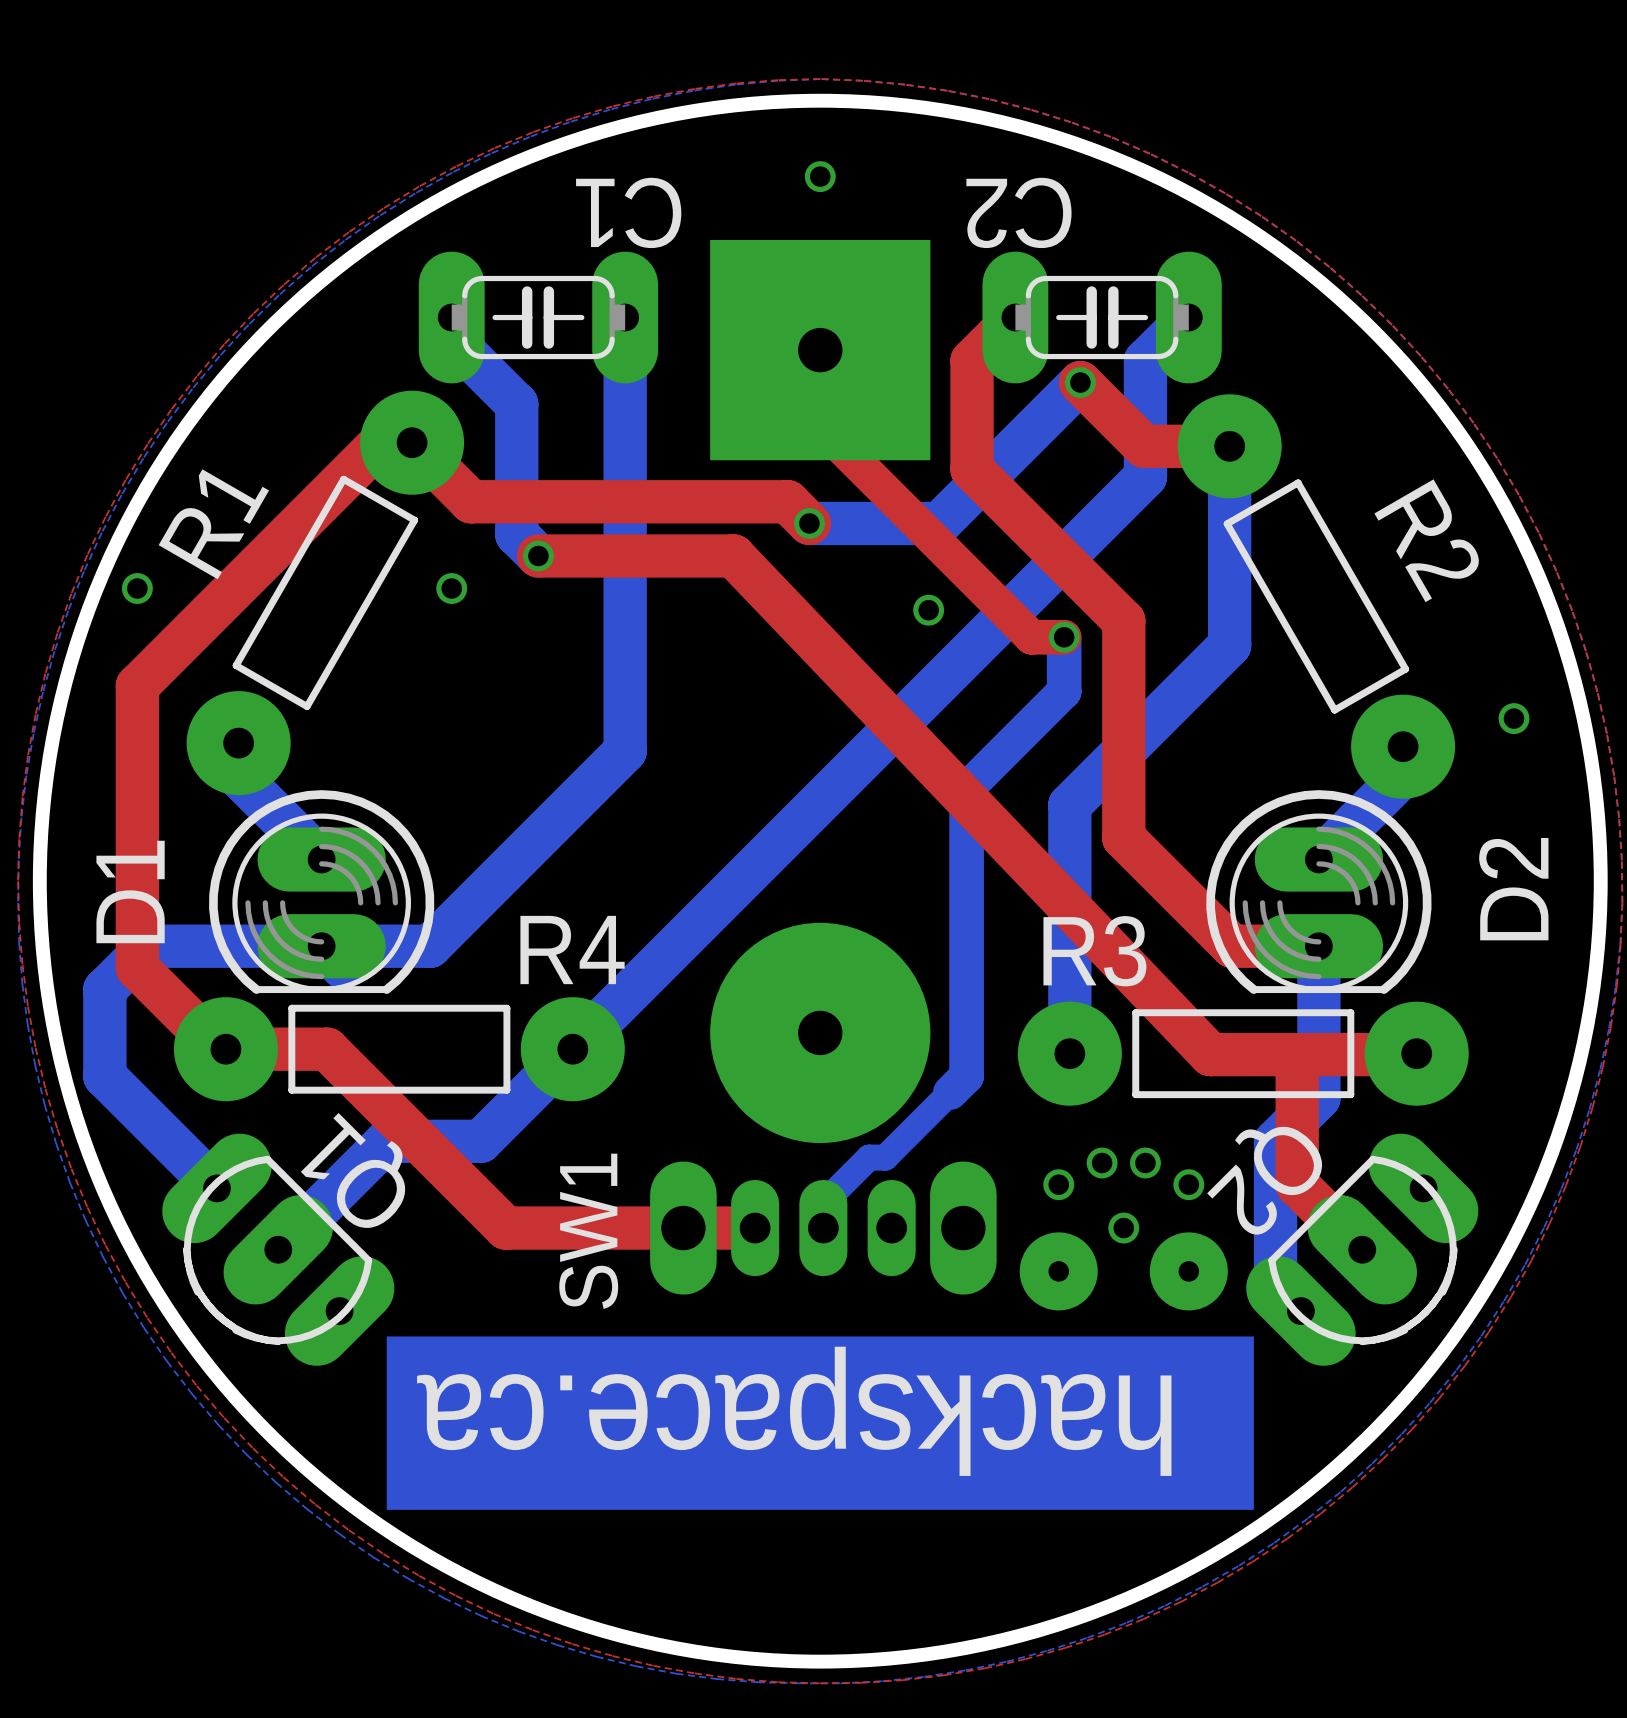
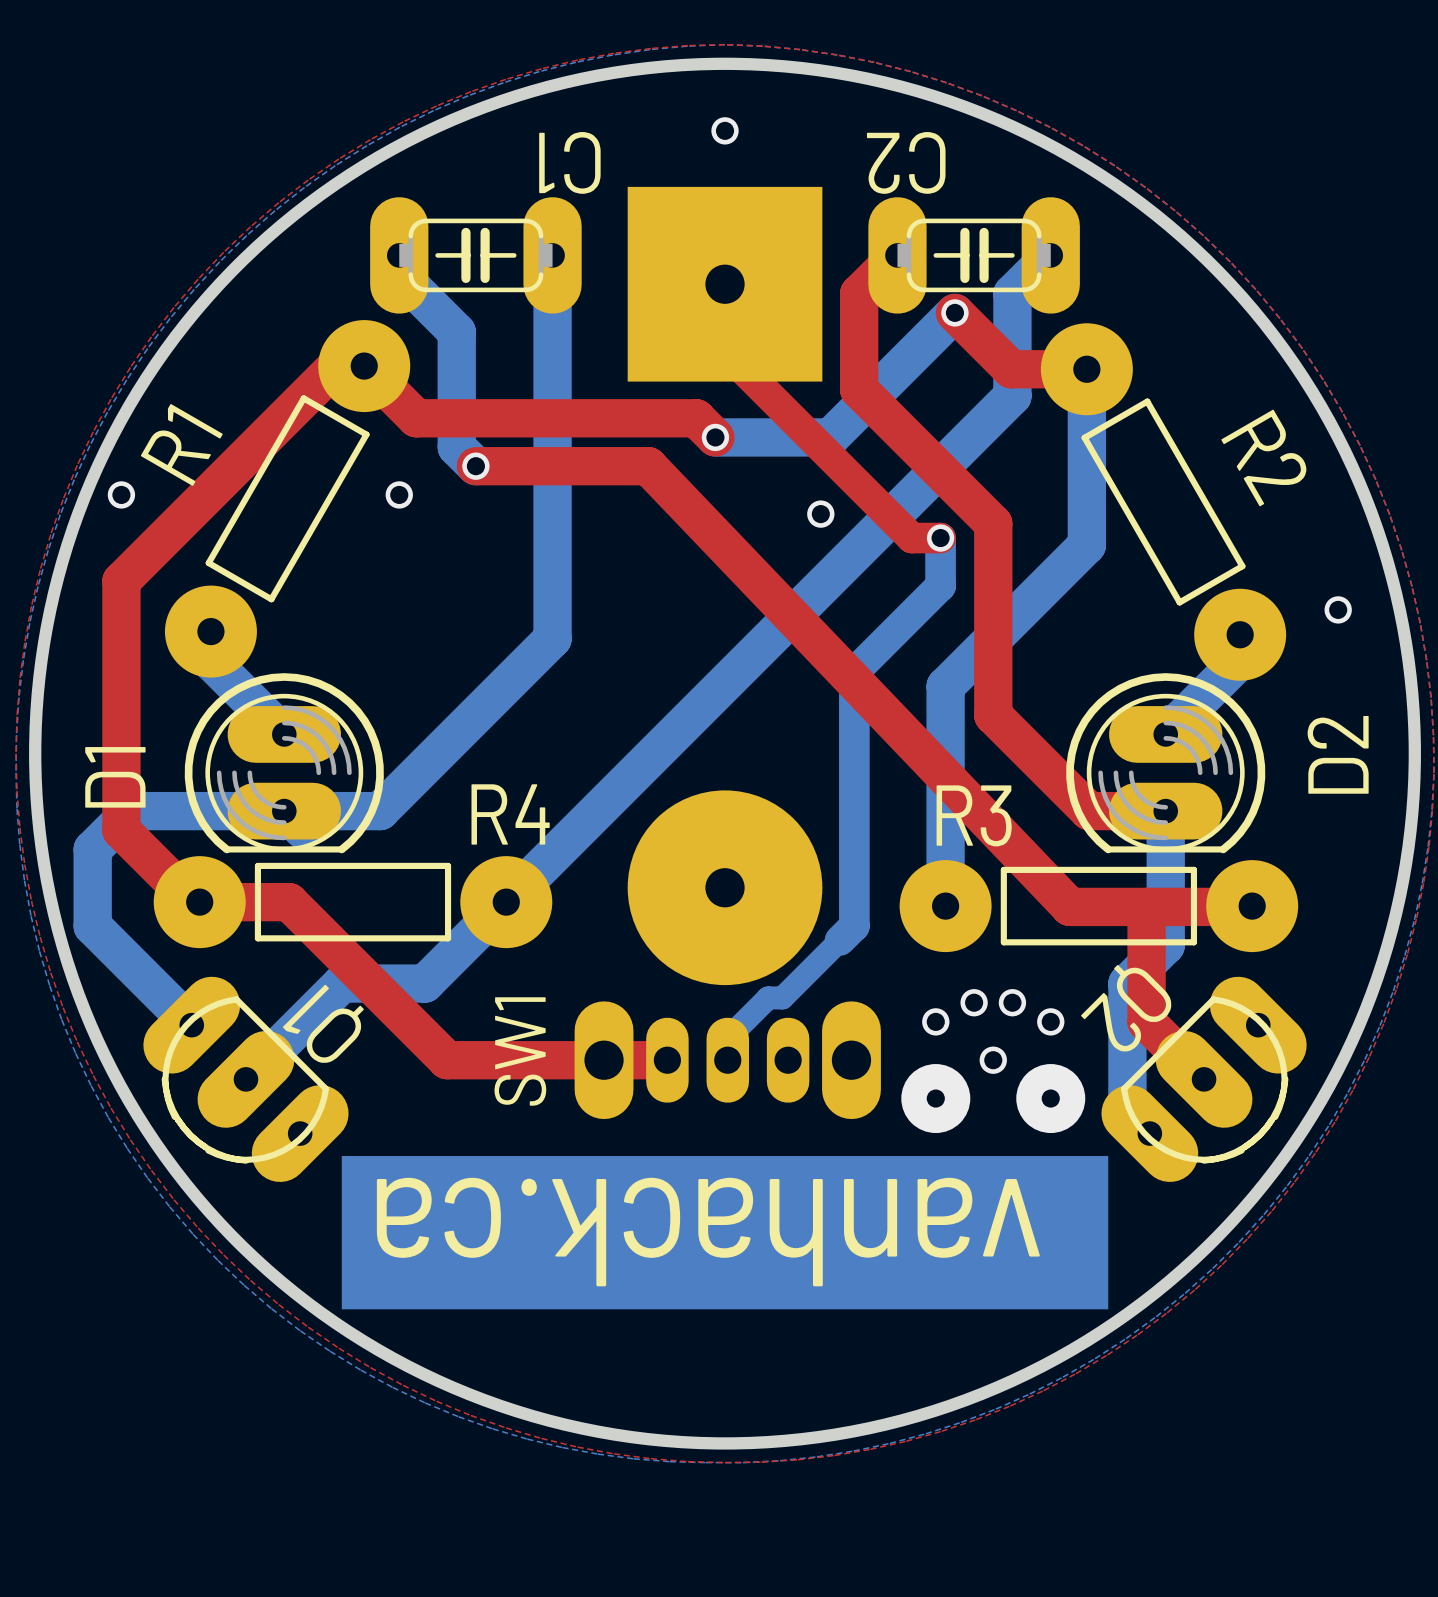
text: hackspace.ca (794, 1411) -> vanhack.ca (708, 1232)

